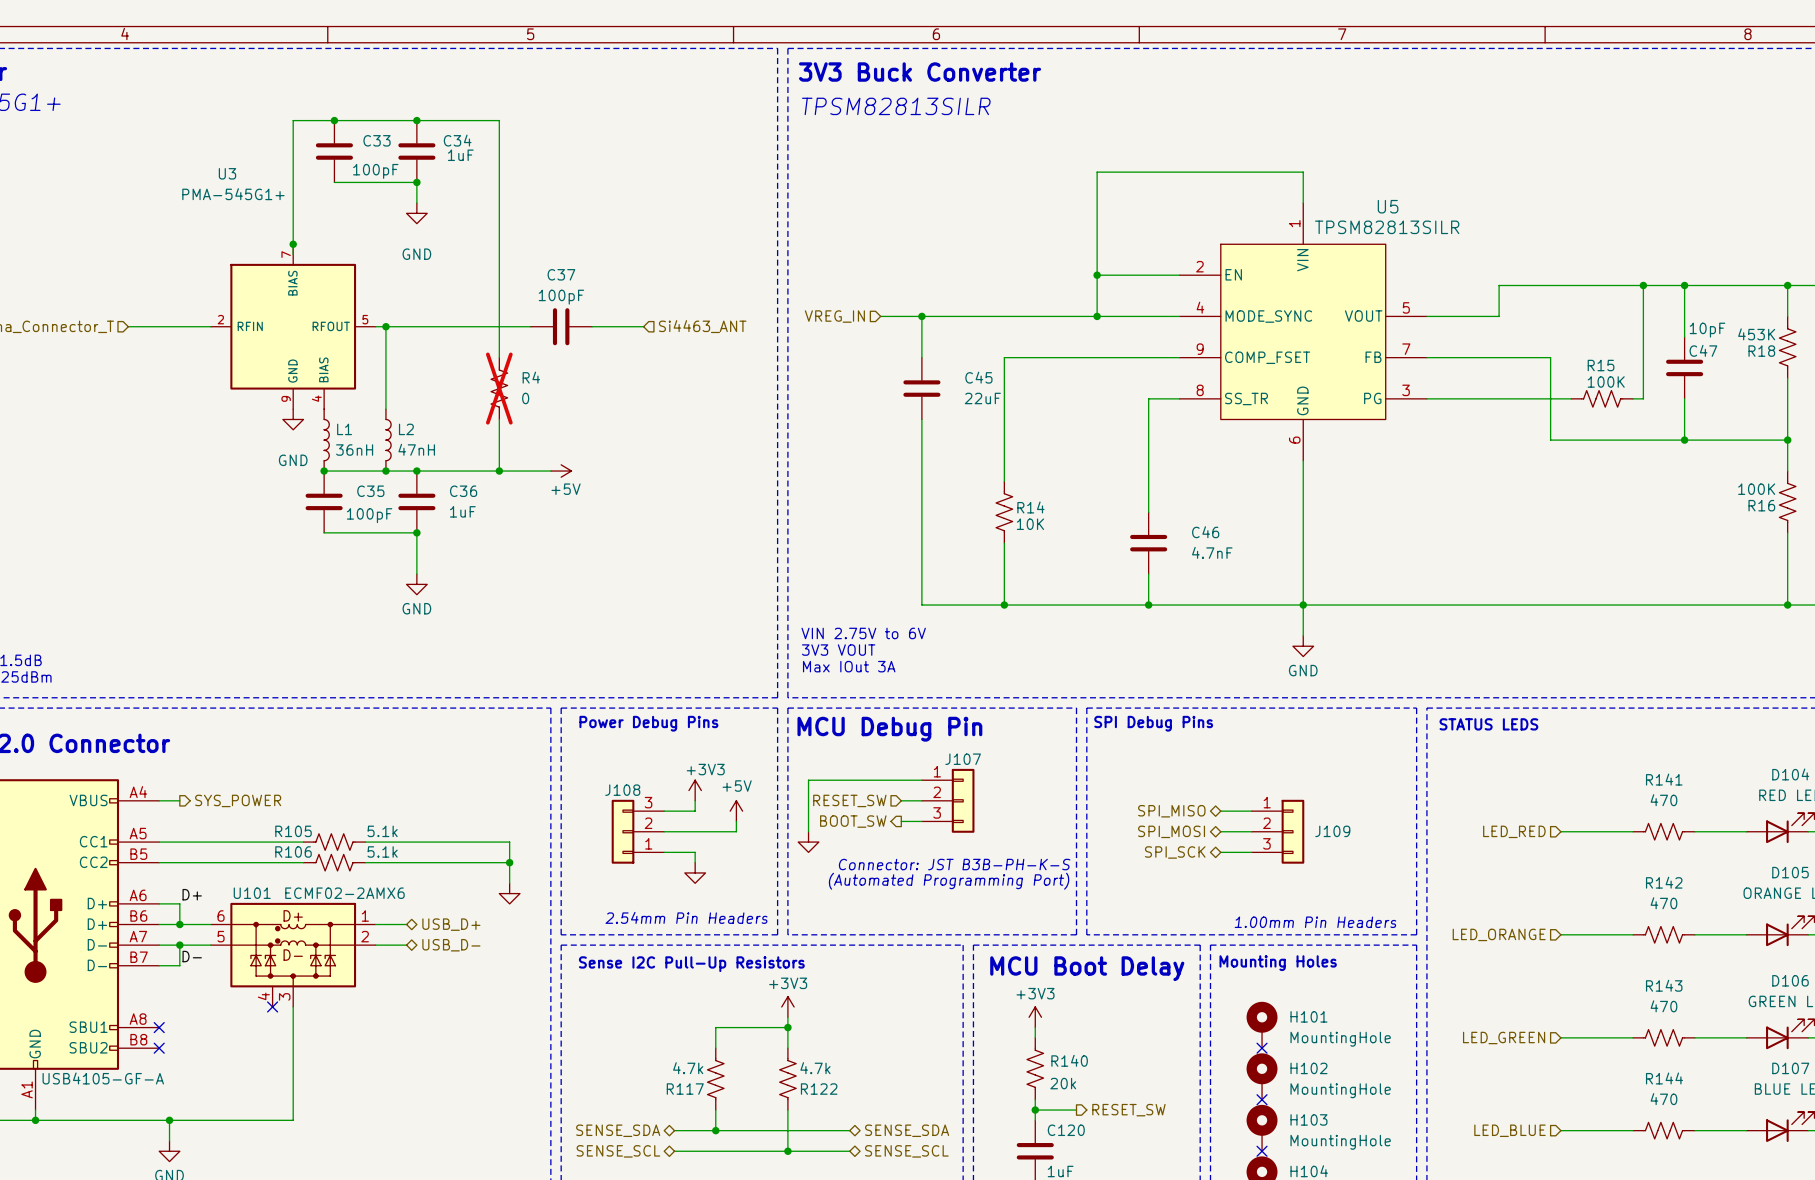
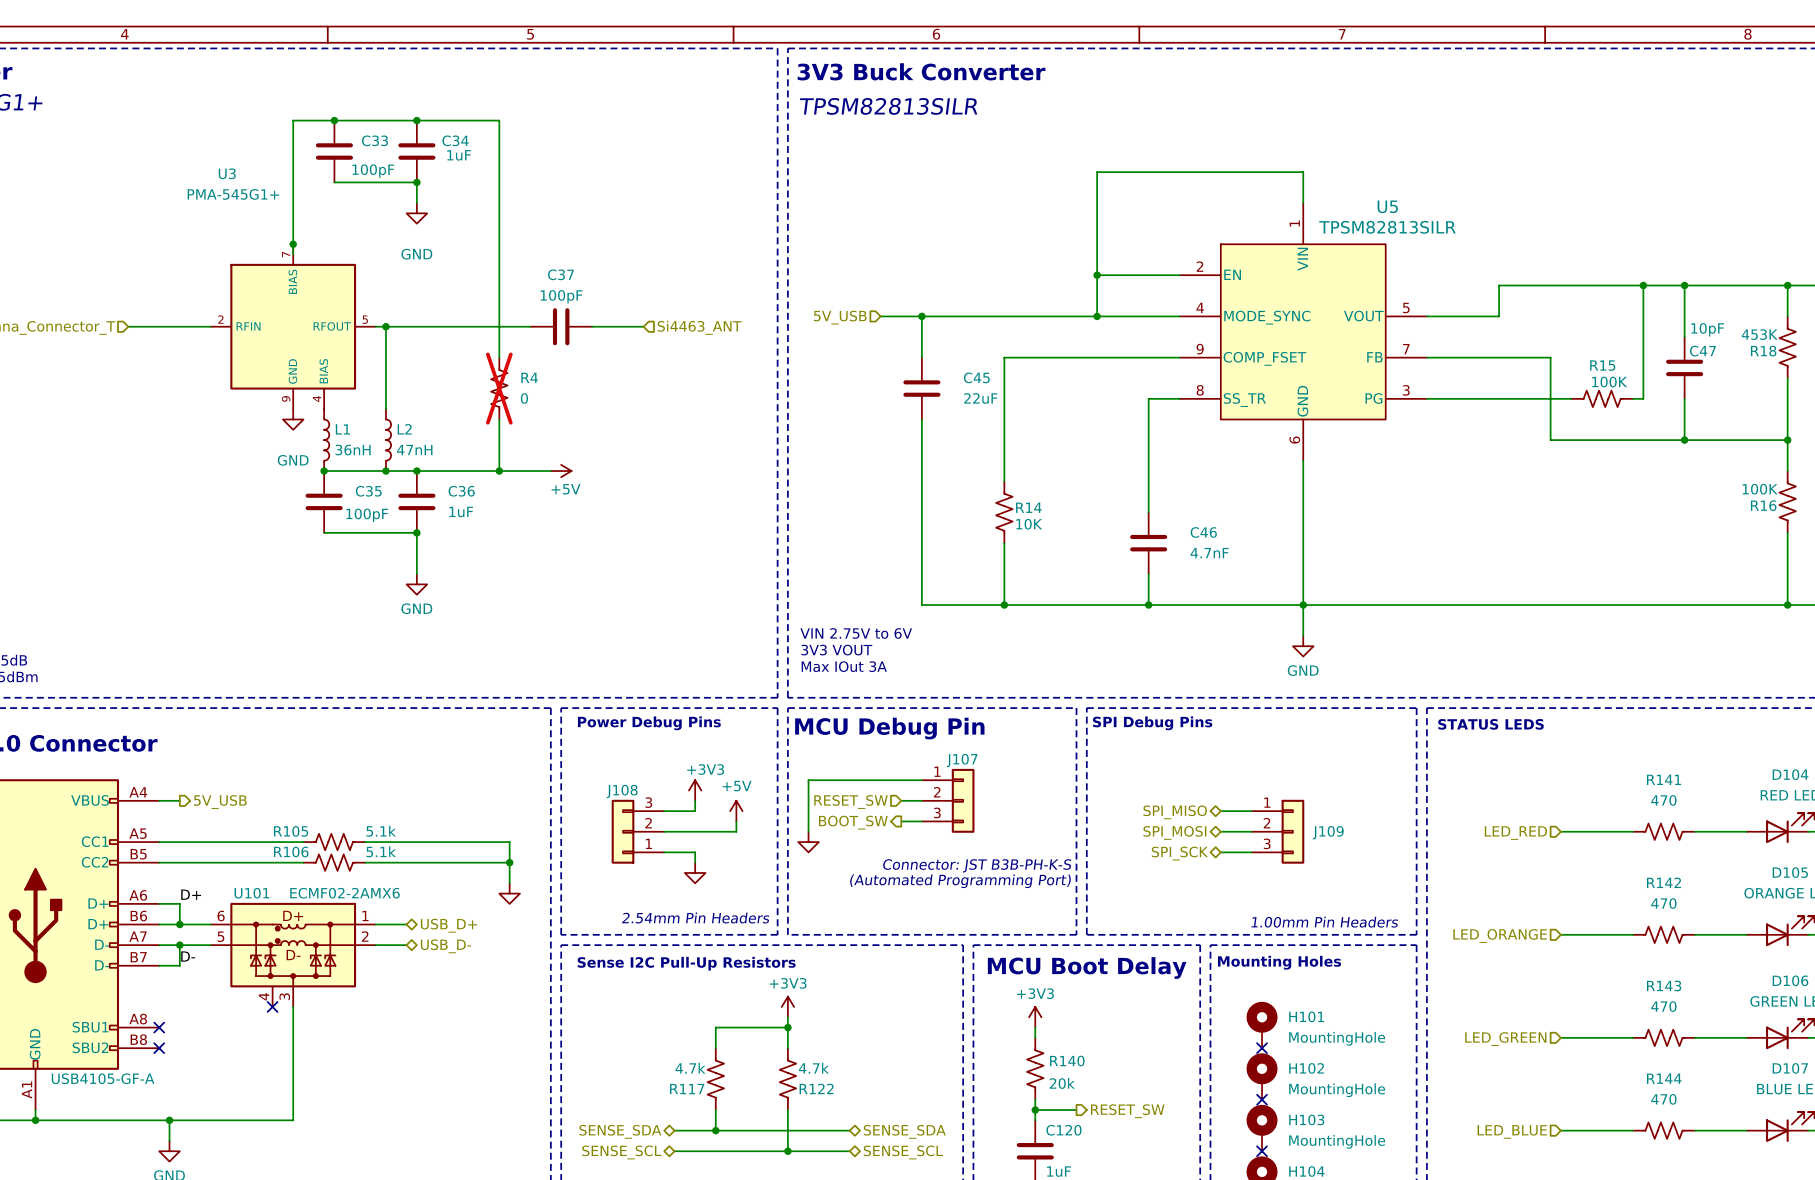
hierarchical label: VREG_IN (834, 316) -> 5V_USB (840, 317)
hierarchical label: SYS_POWER (238, 800) -> 5V_USB (220, 802)

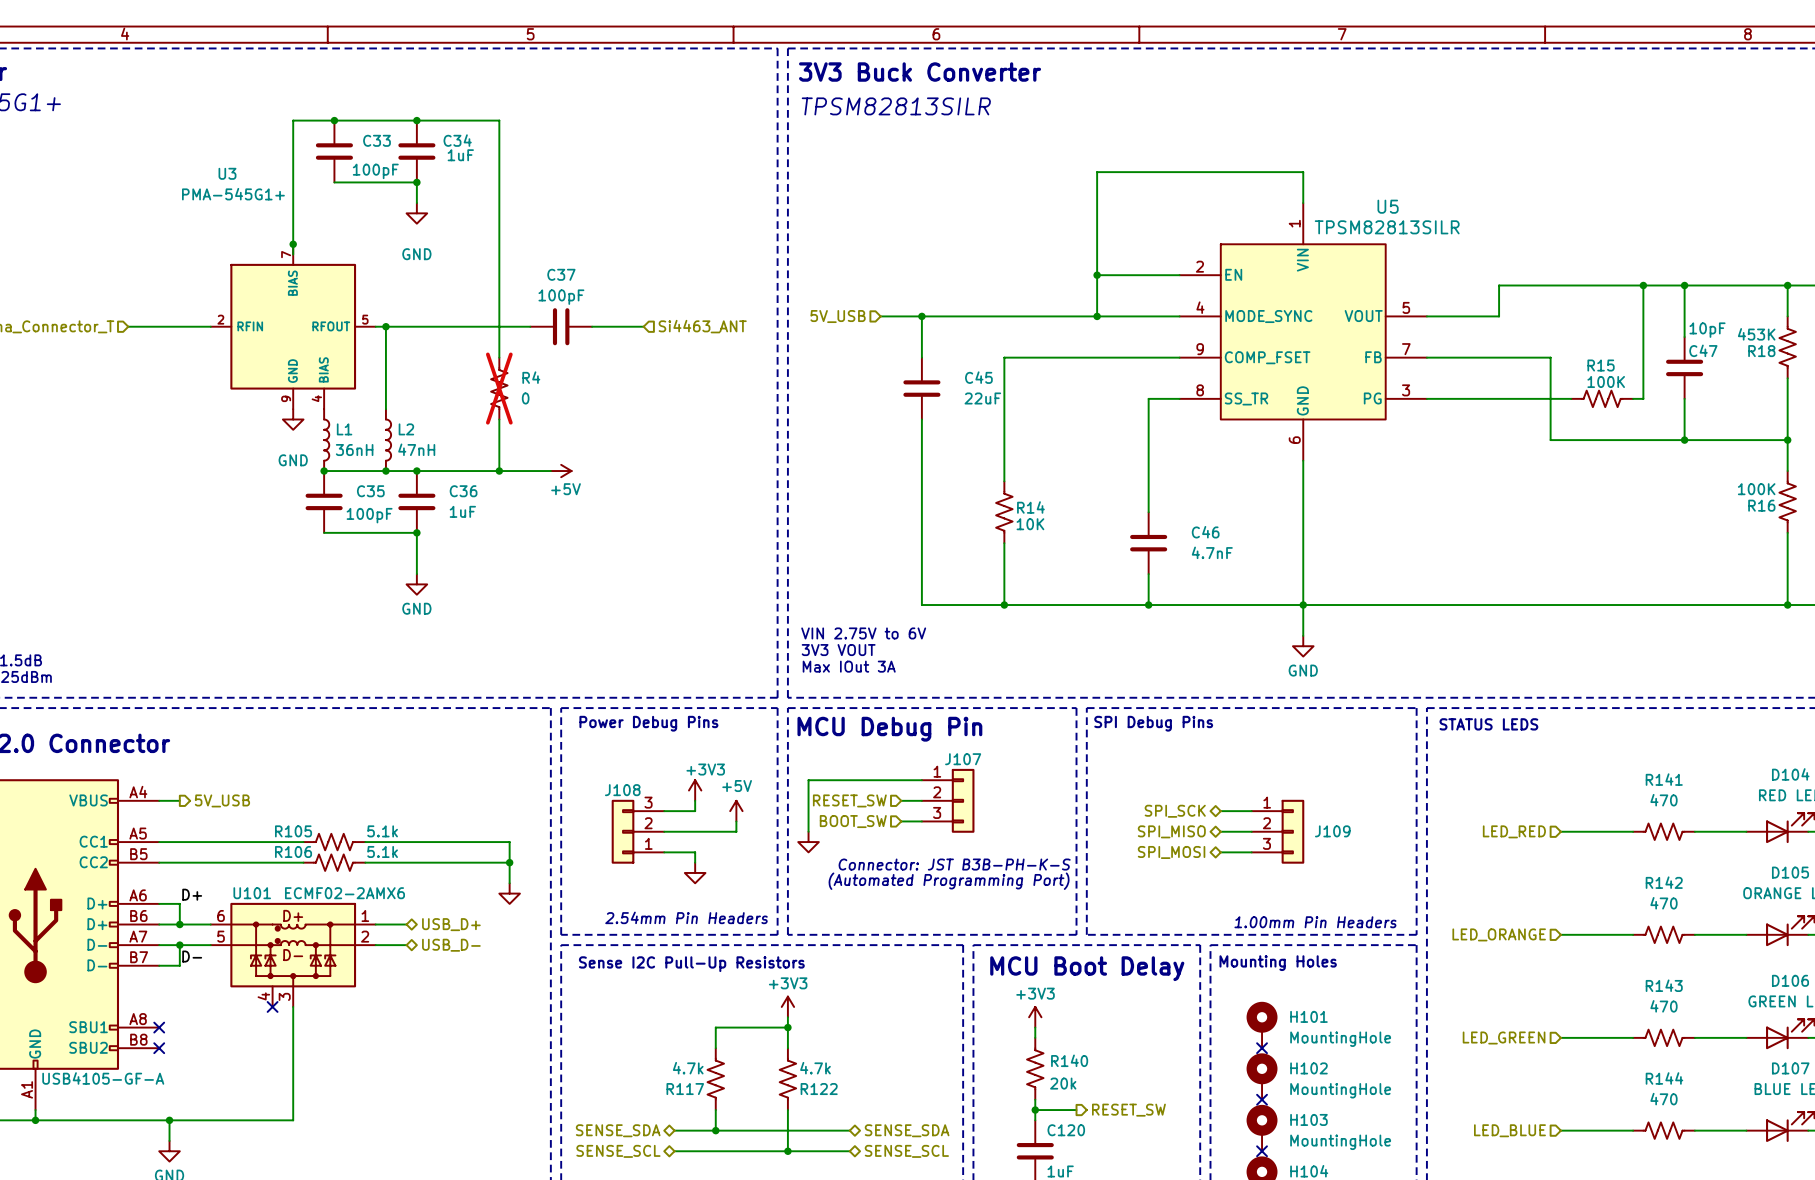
hierarchical label: SPI_MISO (1175, 812) -> SPI_SCK (1175, 811)
hierarchical label shape: output (853, 822) -> input (853, 821)
hierarchical label: SPI_MOSI (1174, 832) -> SPI_MISO (1171, 831)
hierarchical label: SPI_SCK (1179, 853) -> SPI_MOSI (1171, 852)

